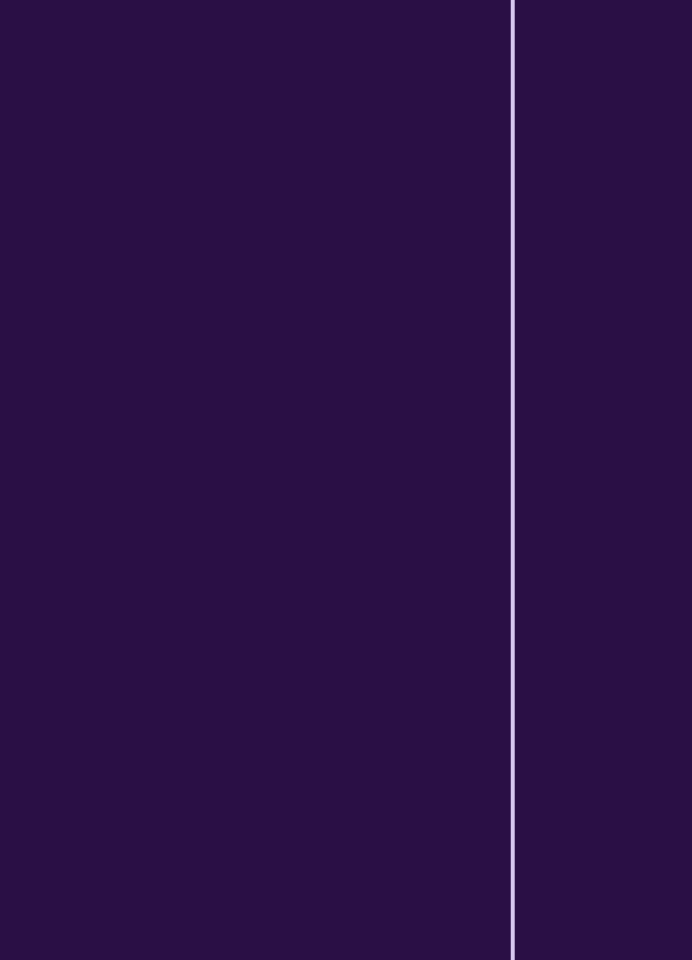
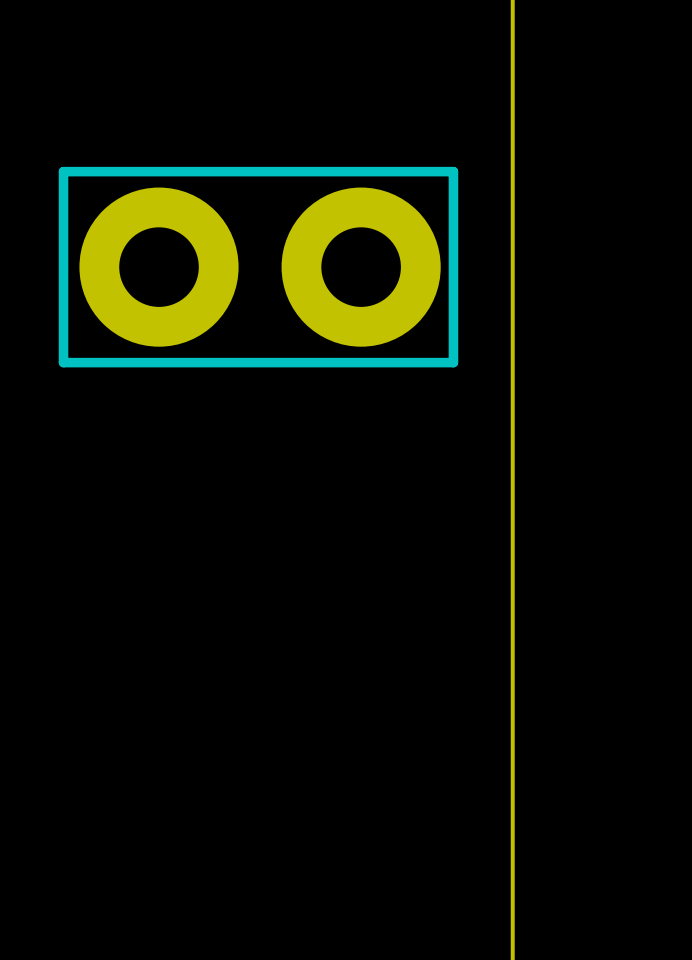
part: none -> (258, 267)

